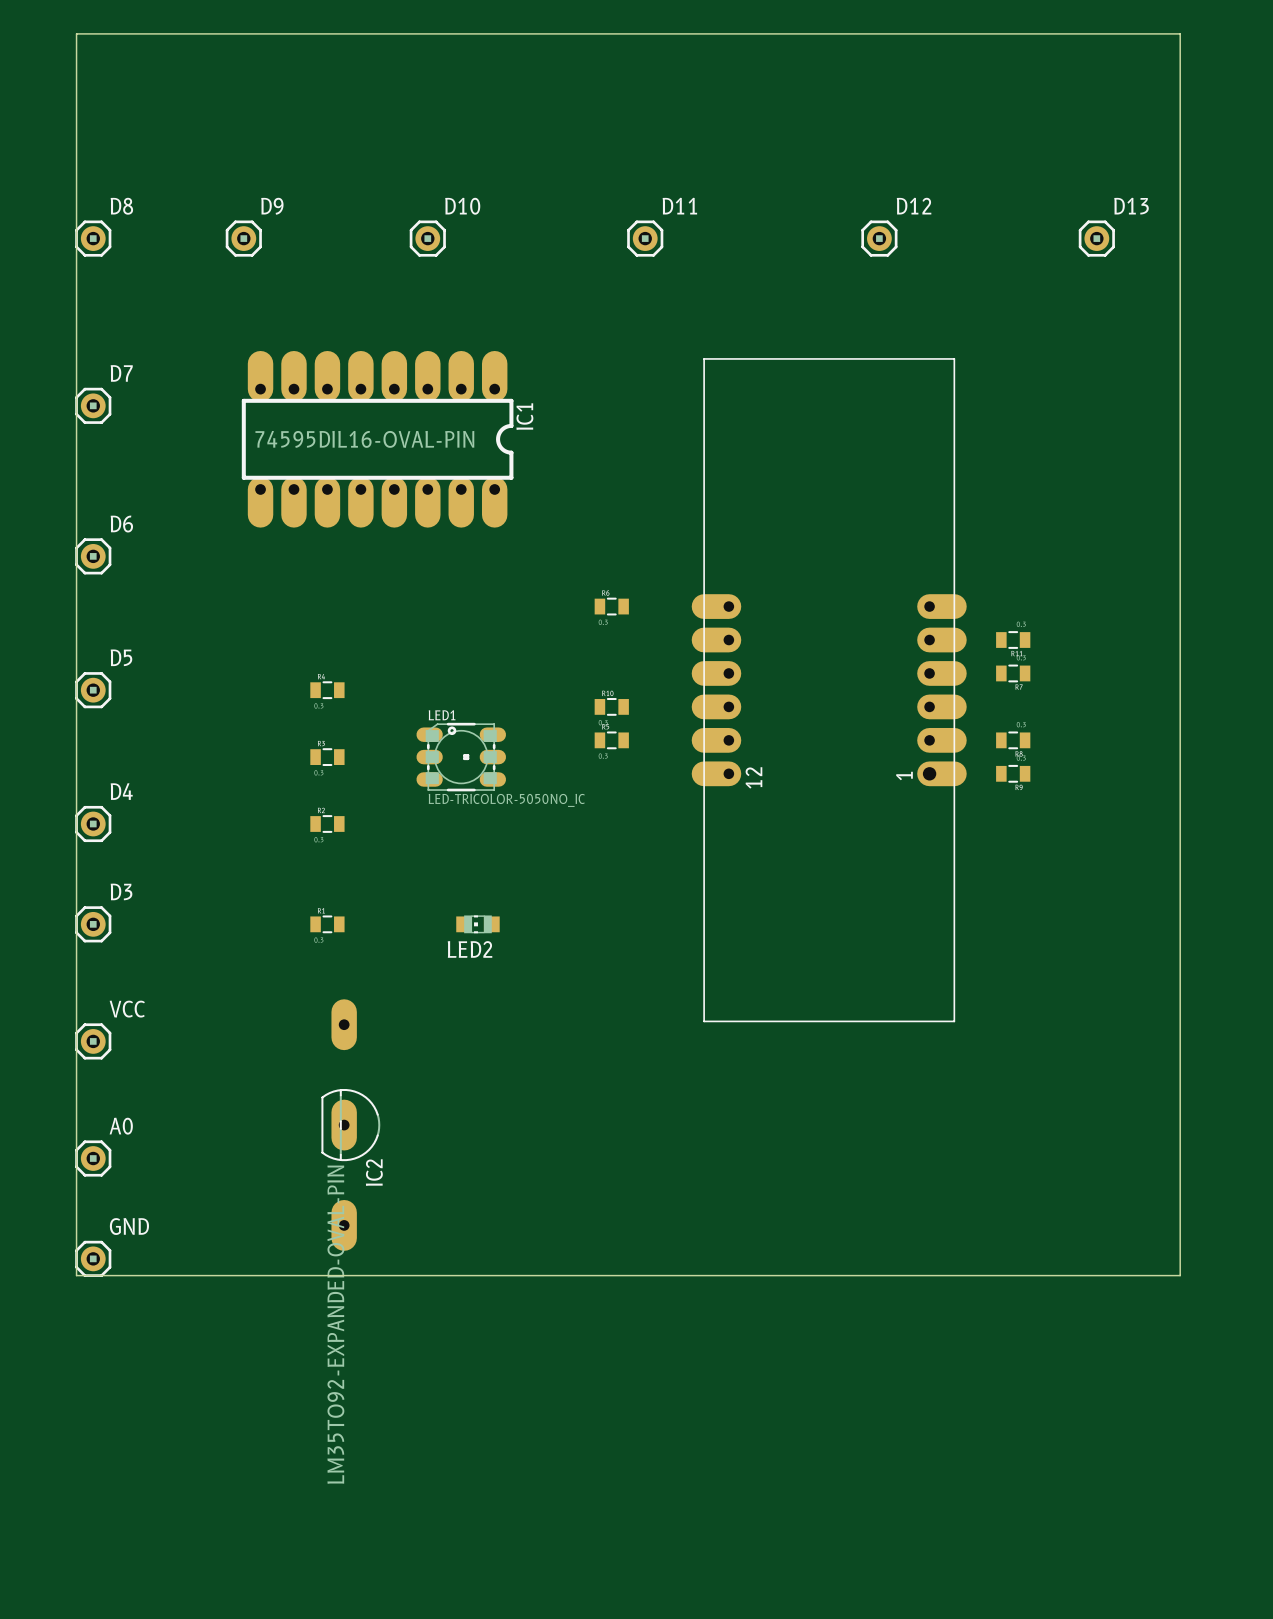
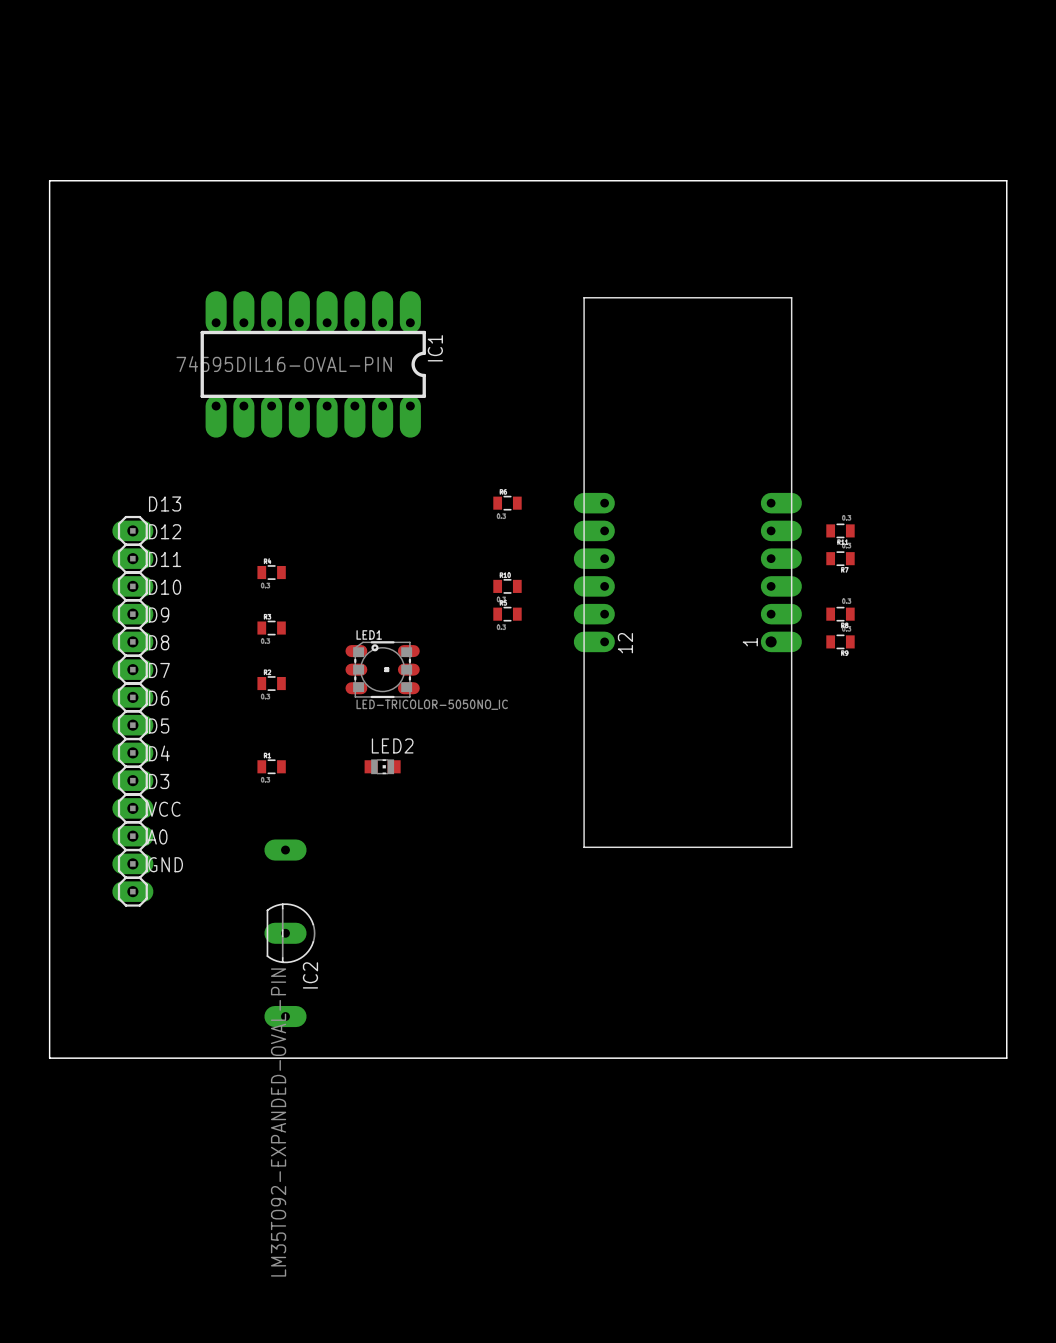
D8 footprint: [75, 220, 112, 257] -> [112, 654, 154, 685]
D9 footprint: [225, 220, 262, 257] -> [112, 626, 154, 657]
D10 footprint: [409, 220, 446, 257] -> [112, 599, 154, 630]
D11 footprint: [627, 220, 664, 257] -> [112, 571, 154, 602]
D12 footprint: [861, 220, 898, 257] -> [112, 543, 154, 574]
D13 footprint: [1078, 220, 1115, 257] -> [112, 515, 154, 546]
D7 footprint: [75, 387, 112, 424] -> [112, 682, 154, 713]
D6 footprint: [75, 538, 112, 575] -> [112, 710, 154, 741]
D5 footprint: [75, 672, 112, 709] -> [112, 737, 154, 768]
LED1 position: (461, 757) -> (382, 669)
D4 footprint: [75, 805, 112, 843] -> [112, 765, 154, 796]
D3 footprint: [75, 906, 112, 943] -> [112, 793, 154, 824]
LED2 rotation: 0° (477, 924) -> 180° (382, 766)
IC2 footprint: [321, 999, 381, 1251] -> [264, 839, 316, 1028]
VCC: none -> (132, 836)
VCC: (93, 1041) -> none
GND: none -> (132, 891)
A0 footprint: [75, 1140, 112, 1177] -> [112, 848, 154, 879]
GND: (93, 1258) -> none
board edge: (76, 1275) (76, 33) (1180, 33) (1180, 1275) -> (63, 1058) (49, 1058) (49, 180) (1006, 180) (1006, 1058) (979, 1058)

